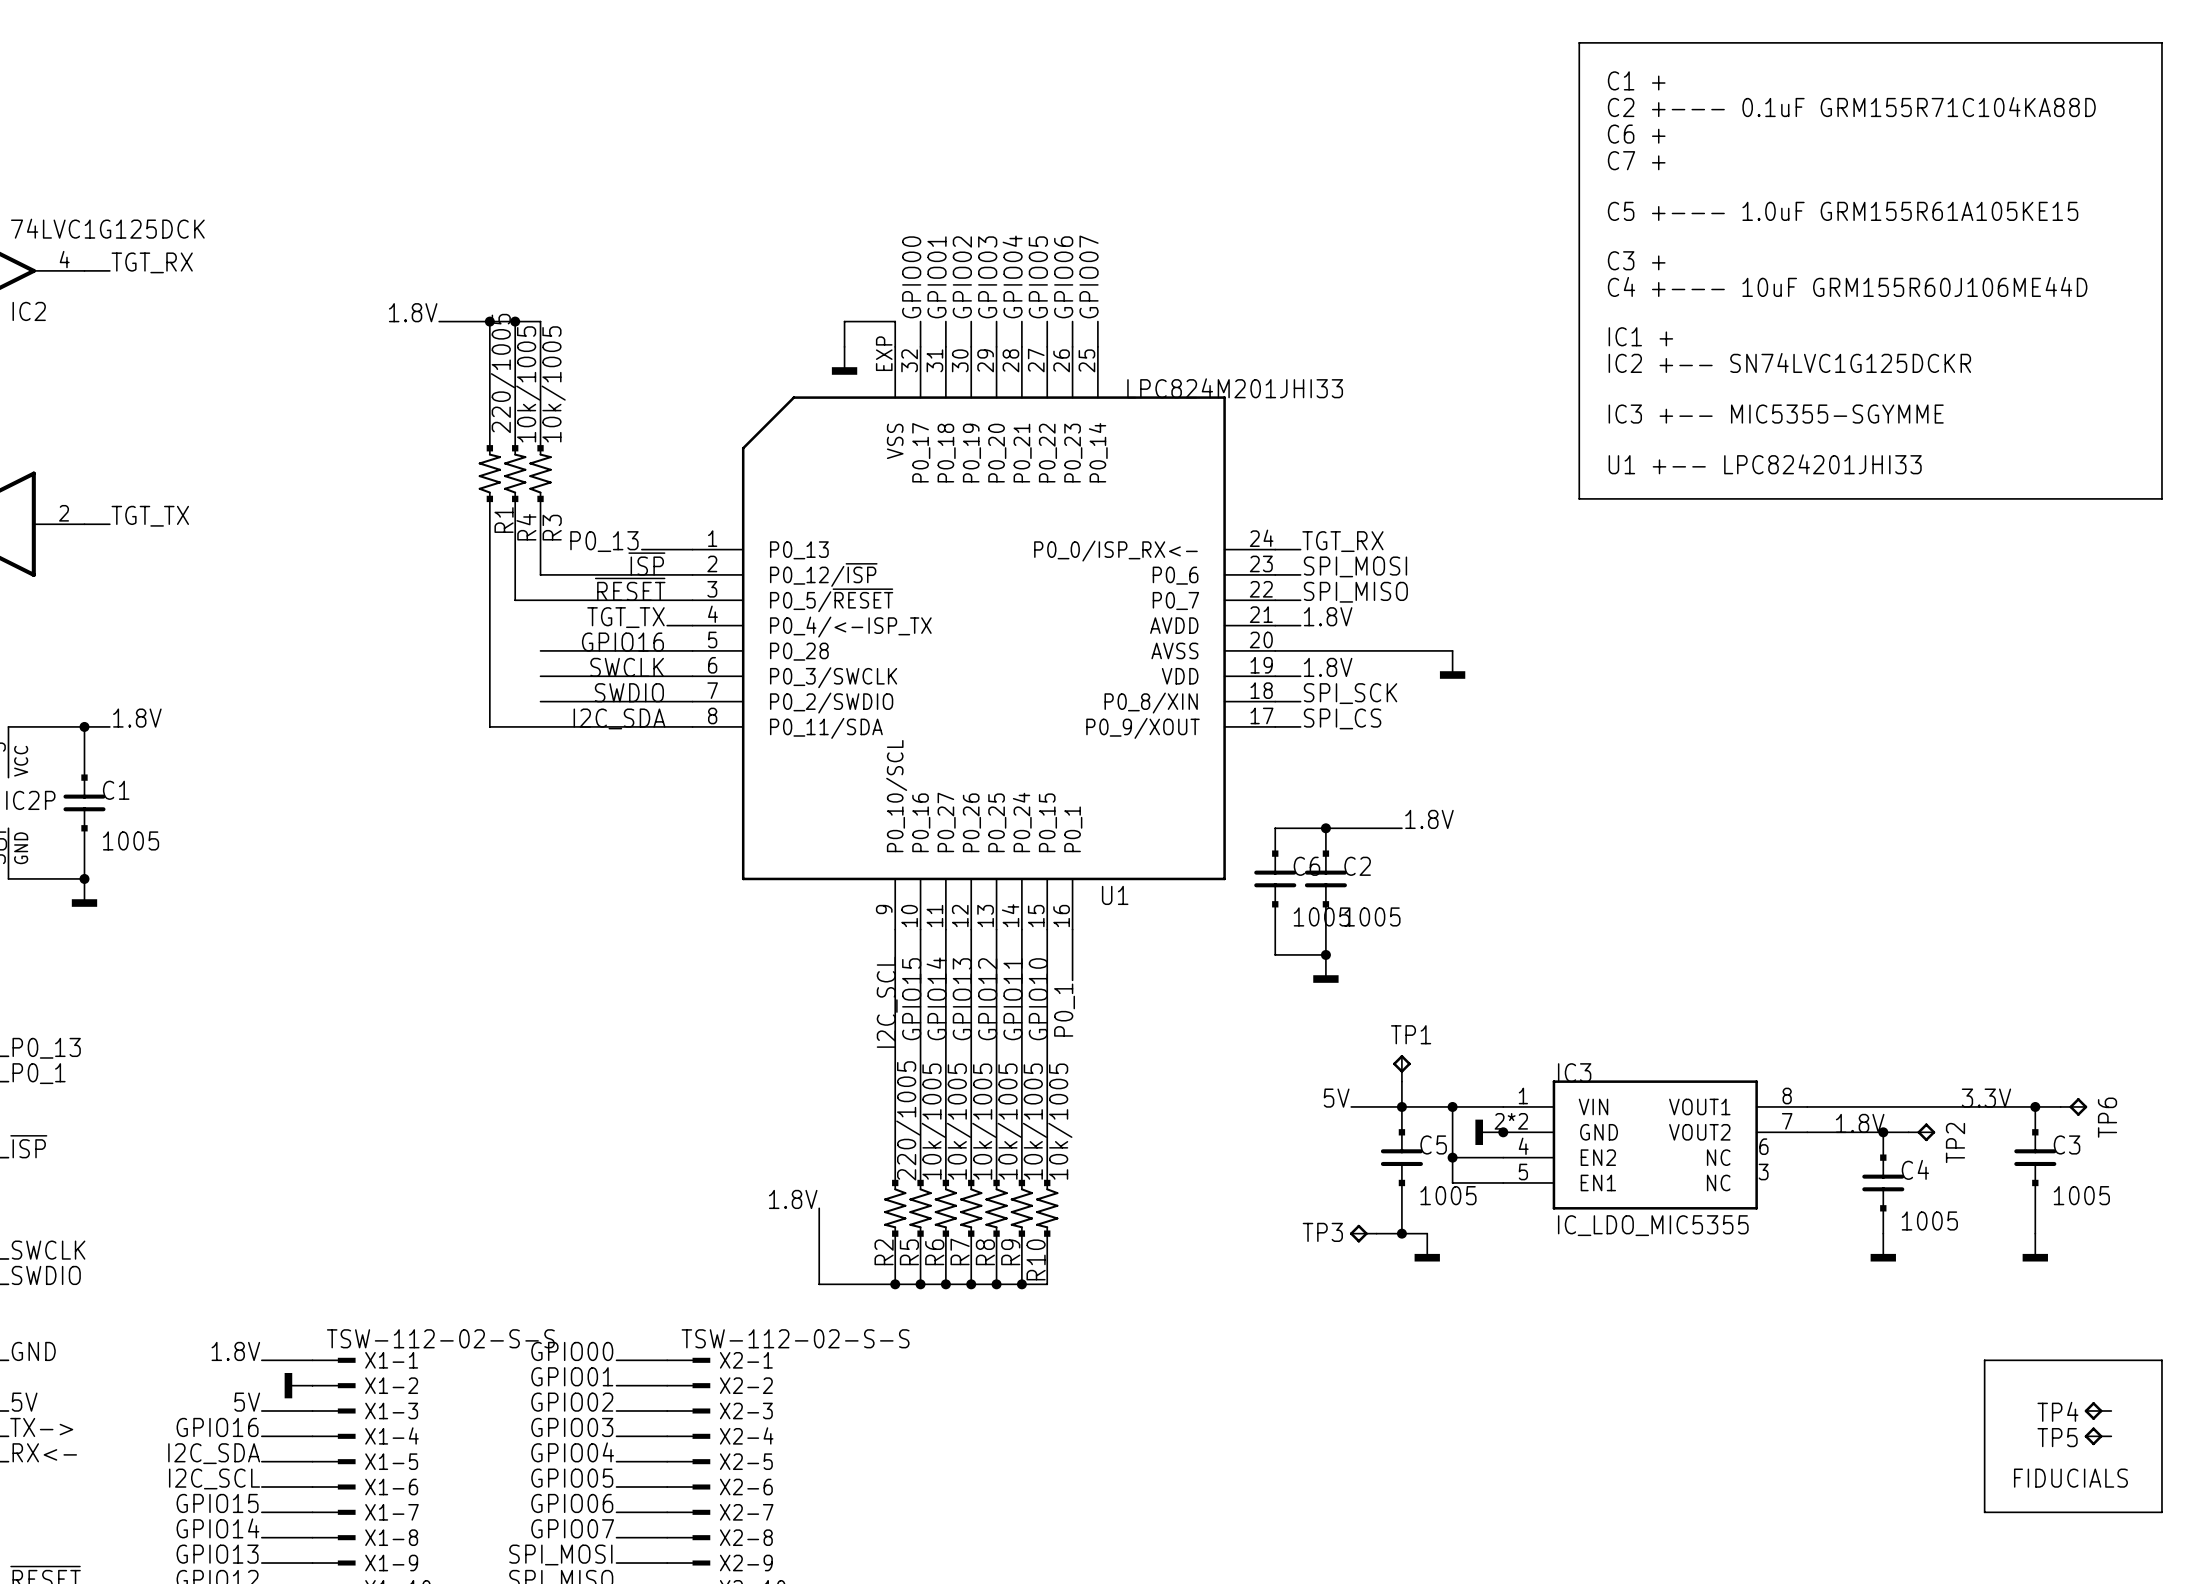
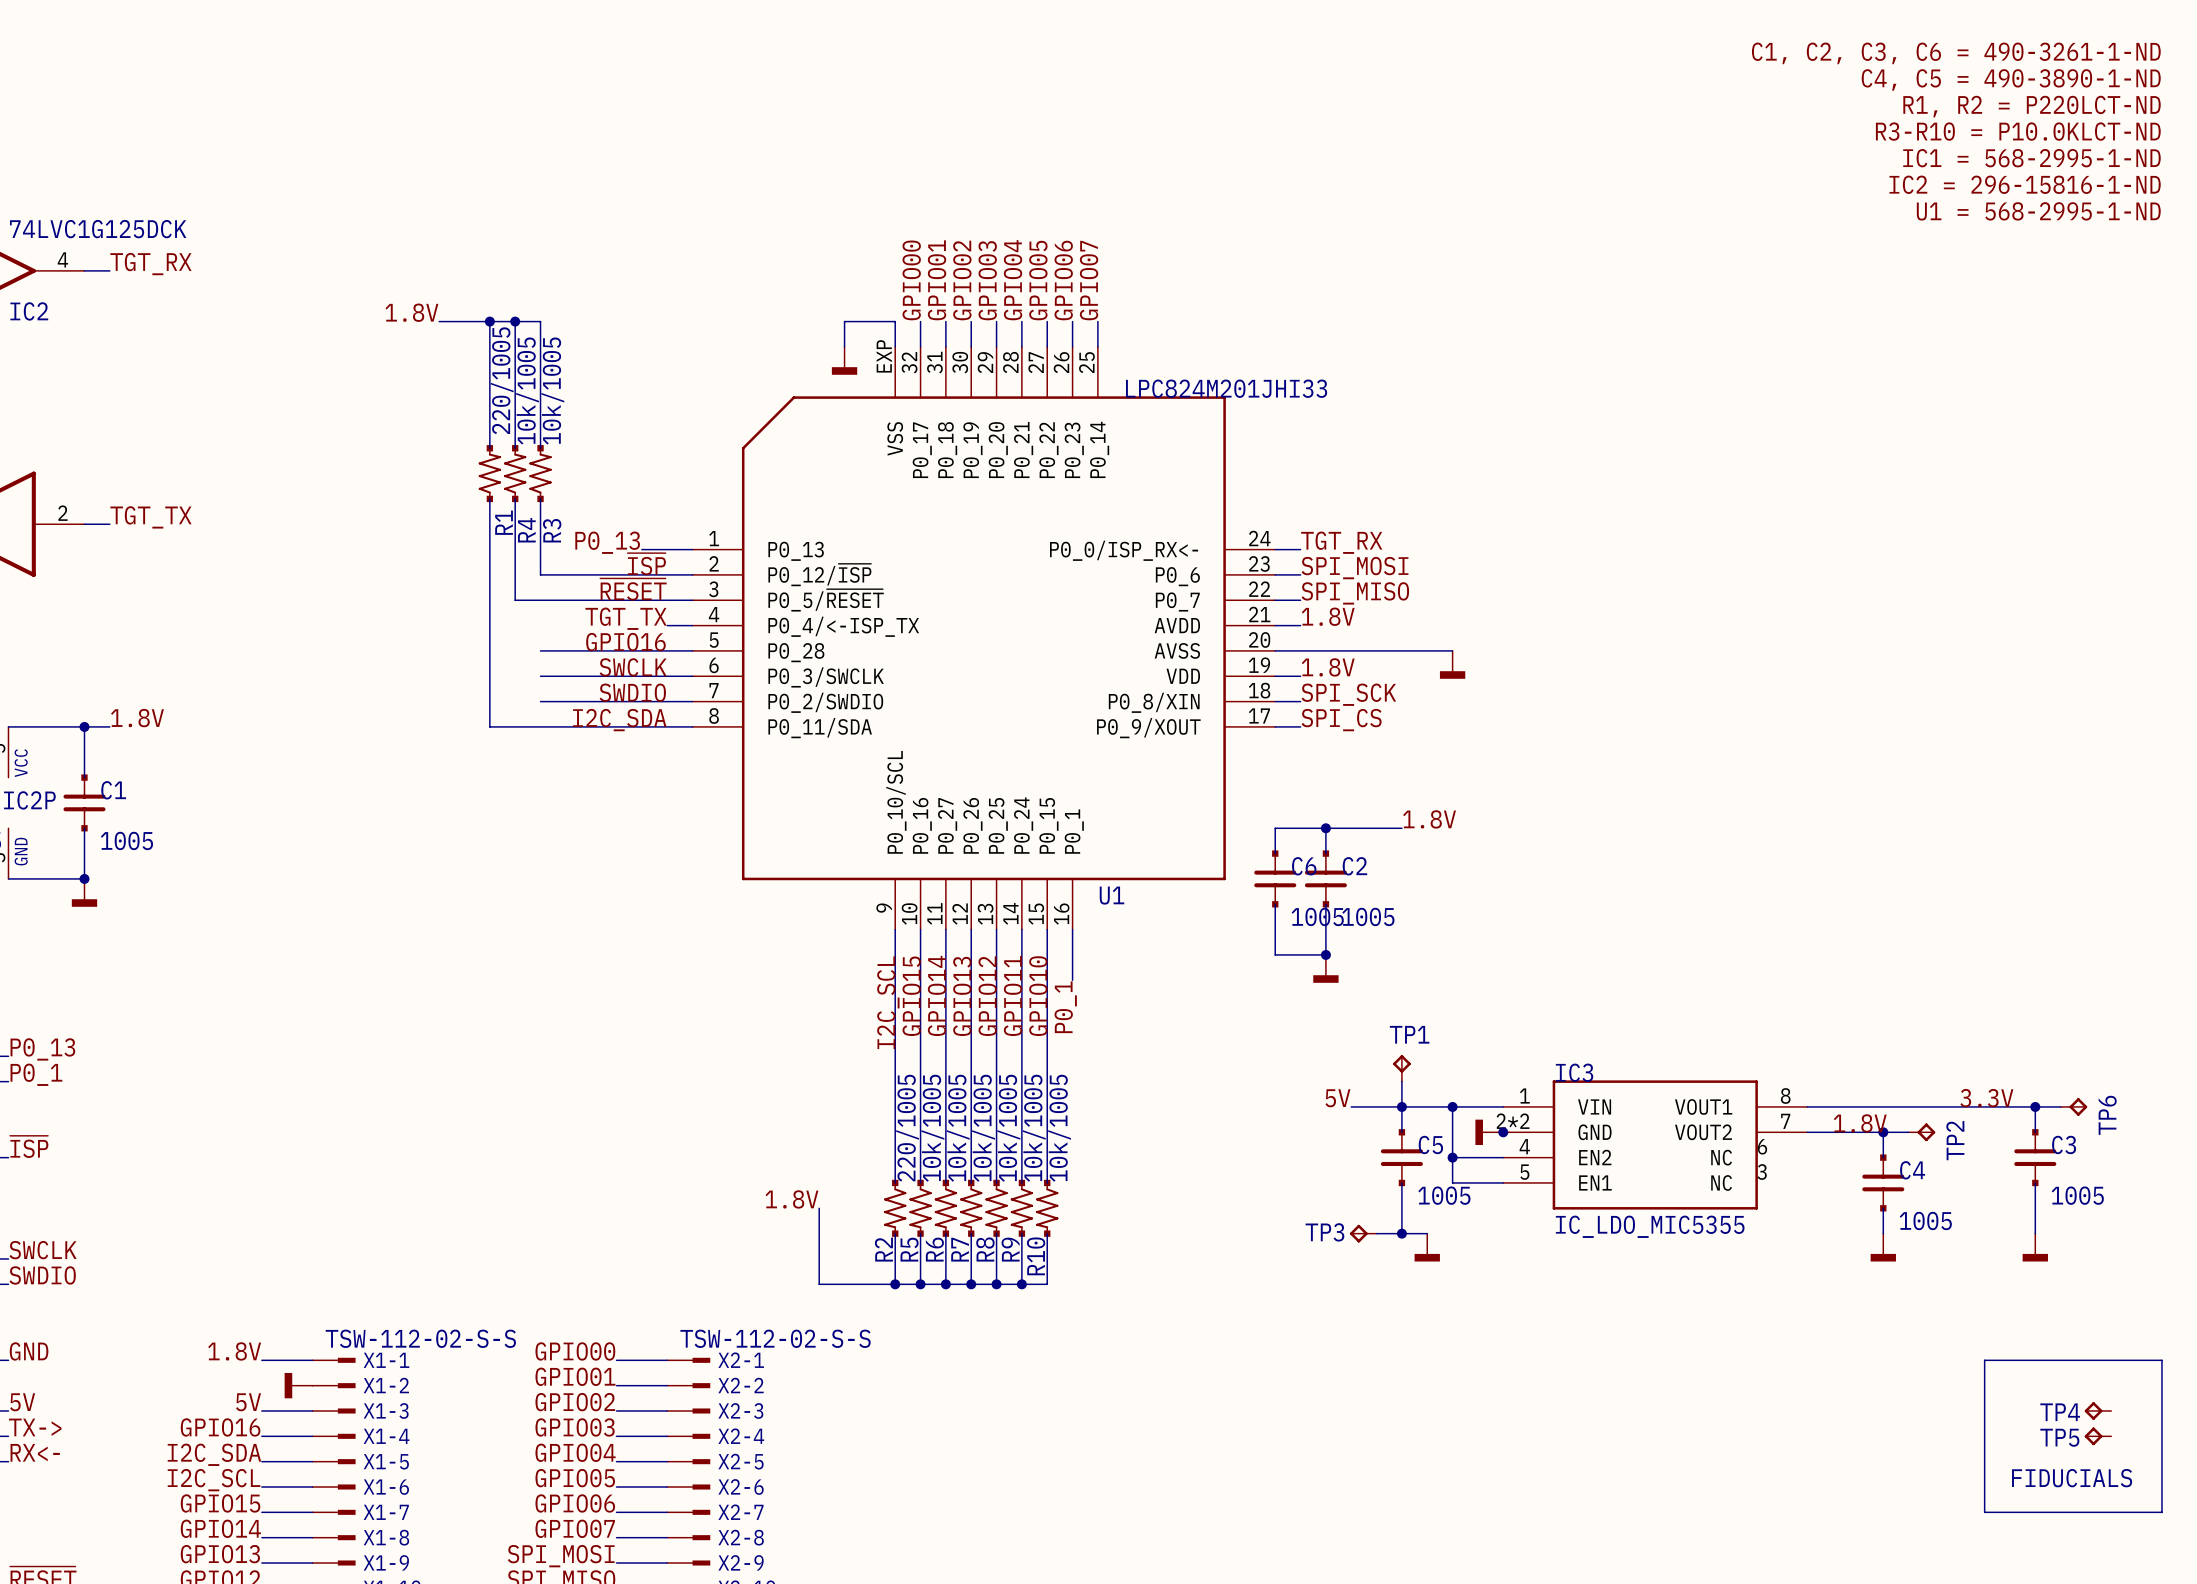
line: (1579, 42) (2161, 42) (2161, 498) (1579, 498) (1579, 42) -> none
text: none -> C1, C2, C3, C6 = 490-3261-1-ND (1956, 53)
text: none -> C4, C5 = 490-3890-1-ND (2011, 80)
text: C1 + (1636, 80) -> none
text: none -> R1, R2 = P220LCT-ND (2032, 106)
text: C2 +--- 0.1uF GRM155R71C104KA88D (1851, 107) -> none
text: none -> R3-R10 = P10.0KLCT-ND (2018, 131)
text: C6 + (1636, 134) -> none
text: none -> IC1 = 568-2995-1-ND (2031, 158)
text: C7 + (1636, 160) -> none
text: none -> IC2 = 296-15816-1-ND (2025, 184)
text: C5 +--- 1.0uF GRM155R61A105KE15 (1843, 211) -> none
text: none -> U1 = 568-2995-1-ND (2038, 211)
text: C3 + (1636, 260) -> none
text: C4 +--- 10uF GRM155R60J106ME44D (1847, 286) -> none
text: IC1 + (1640, 336) -> none
text: IC2 +-- SN74LVC1G125DCKR (1789, 362) -> none
text: IC3 +-- MIC5355-SGYMME (1776, 414) -> none
text: U1 +-- LPC824201JHI33 (1765, 464) -> none

